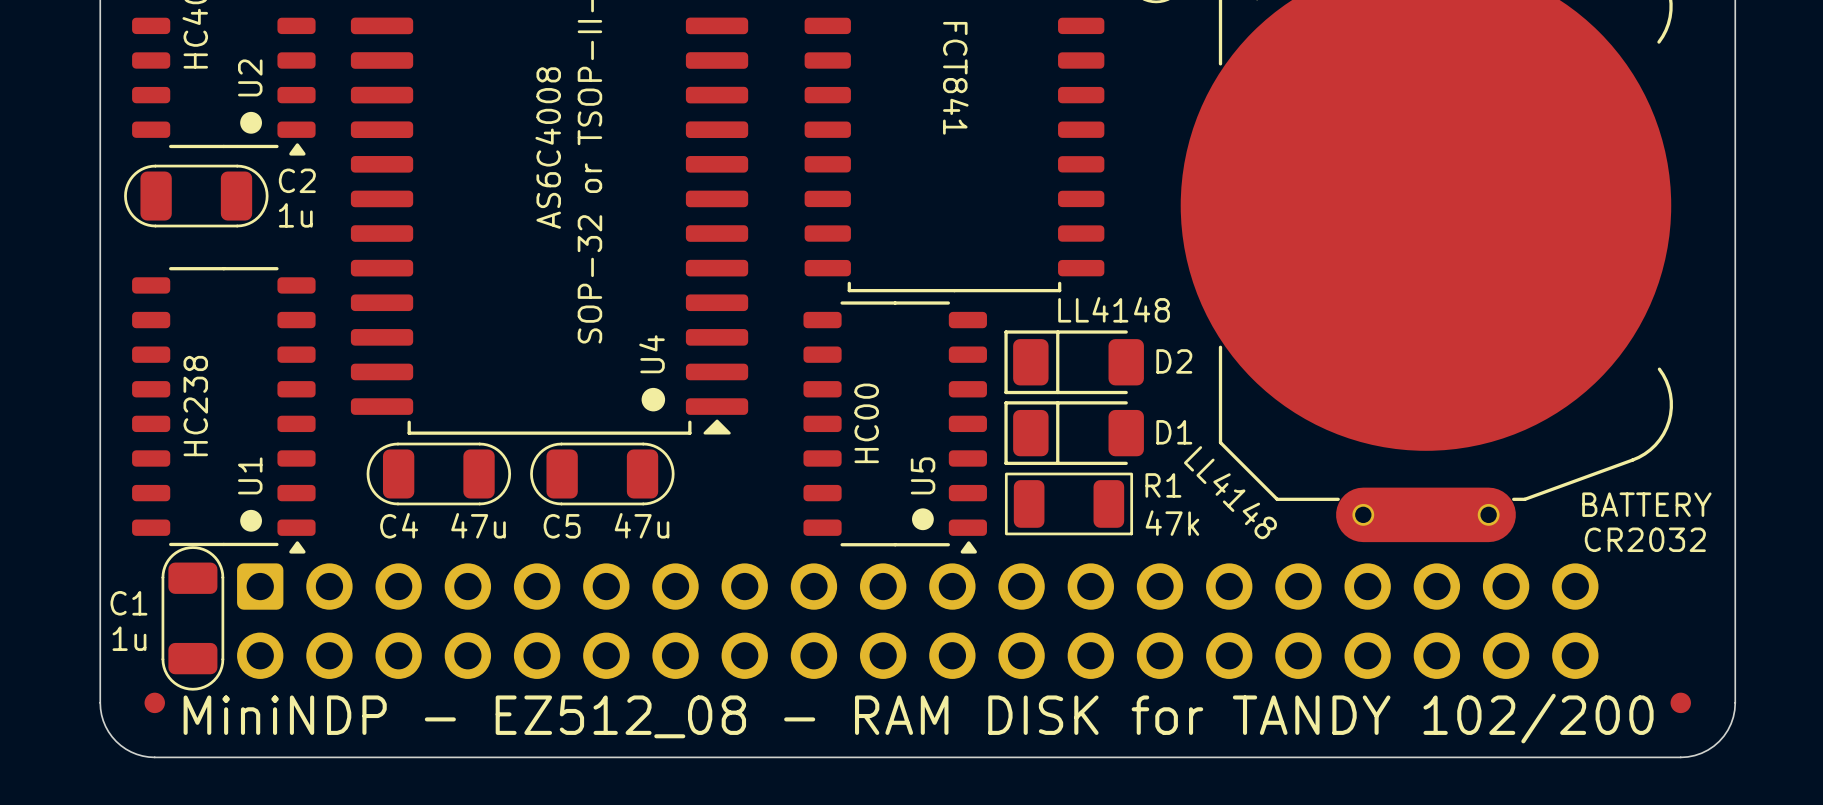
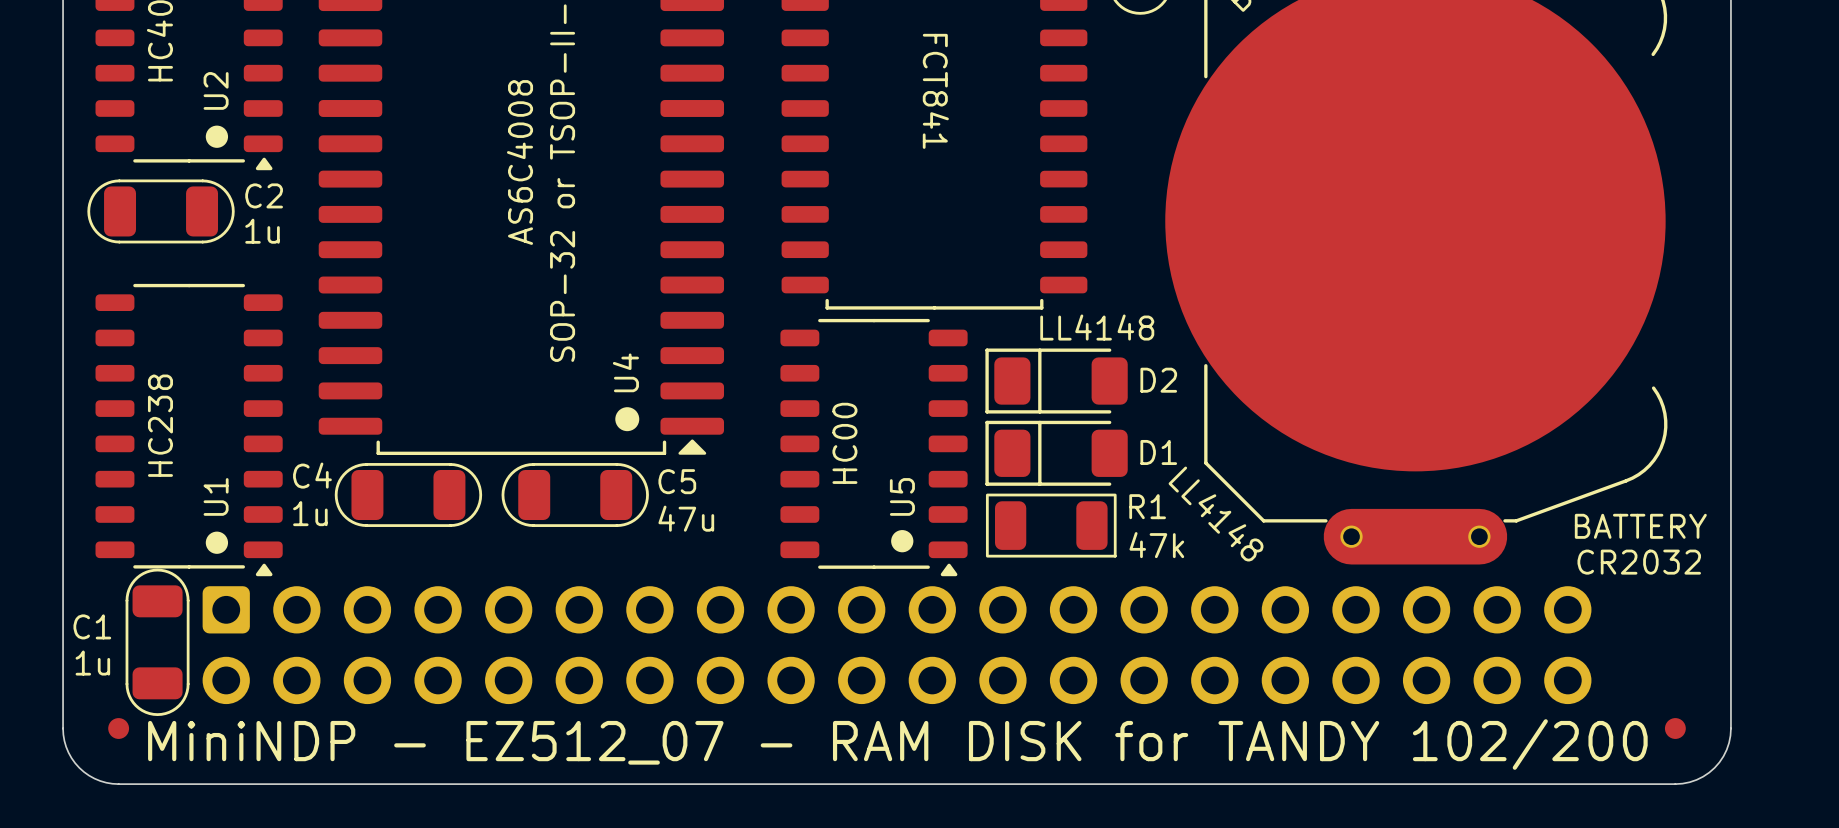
C4 name position: C4 (399, 525) -> C4 (312, 475)
C4 value: 47u (478, 525) -> 1u (310, 513)
C5 value position: 47u (642, 525) -> 47u (686, 518)
C5 name position: C5 (562, 526) -> C5 (677, 481)
text: MiniNDP - EZ512_08 - RAM DISK for TANDY 102/200 (918, 718) -> MiniNDP - EZ512_07 - RAM DISK for TANDY 102/200 (897, 744)

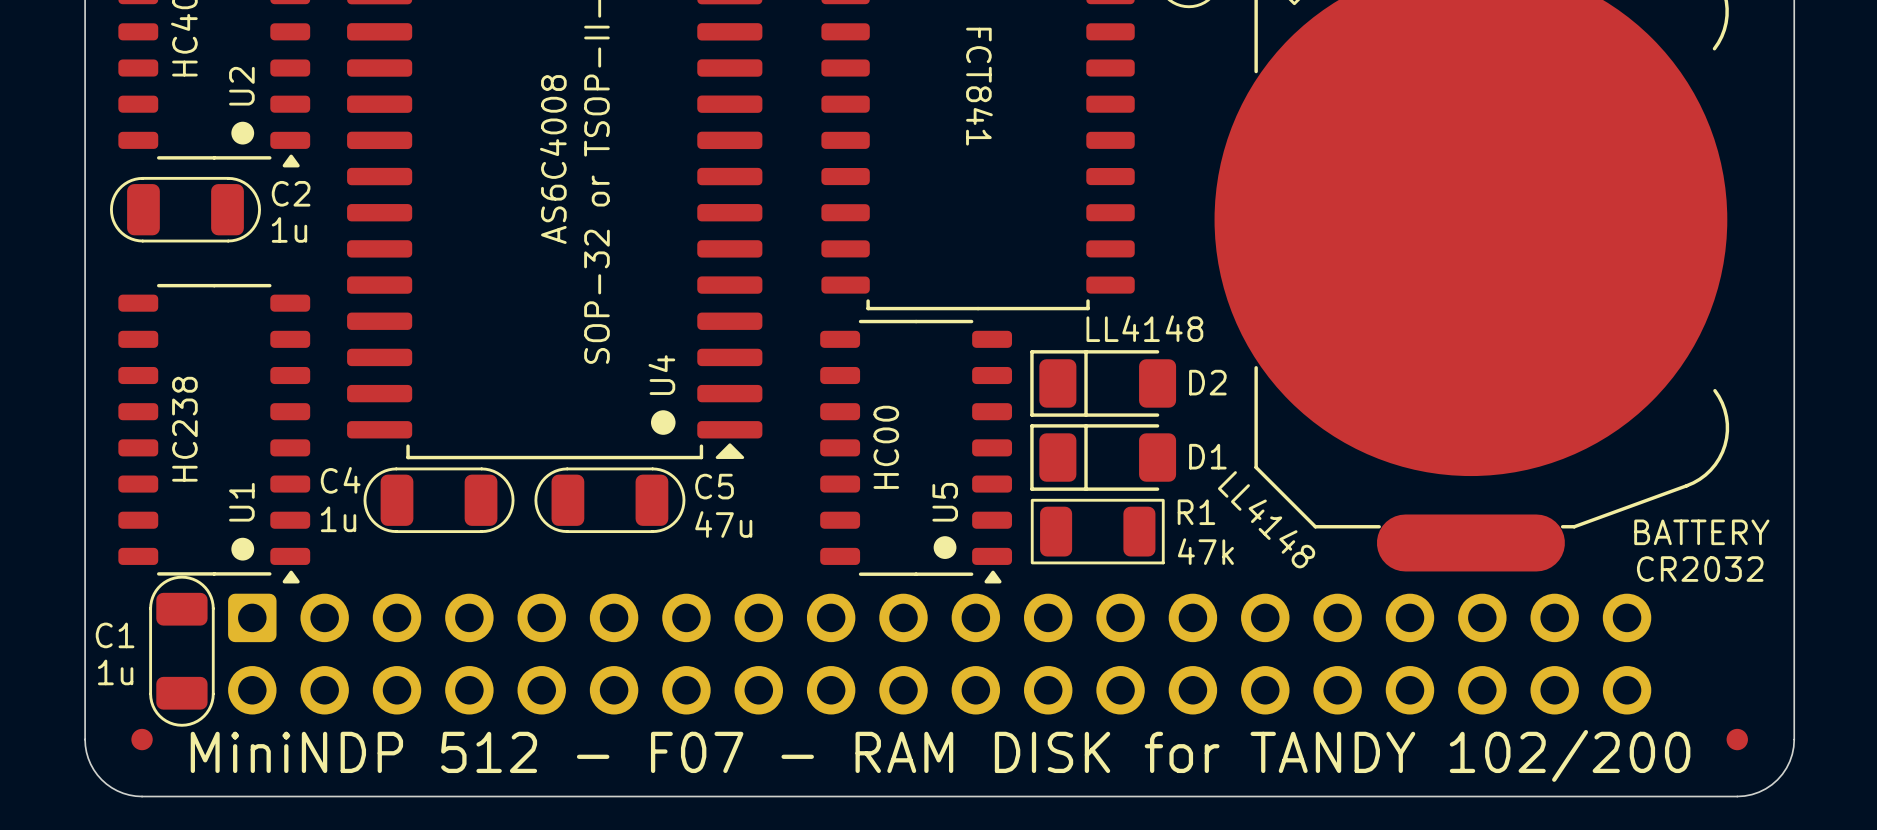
part: (1351, 536) -> none
part: (1479, 536) -> none
text: MiniNDP - EZ512_07 - RAM DISK for TANDY 102/200 (897, 744) -> MiniNDP 512 - F07 - RAM DISK for TANDY 102/200 (940, 755)

